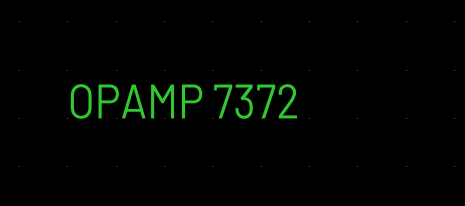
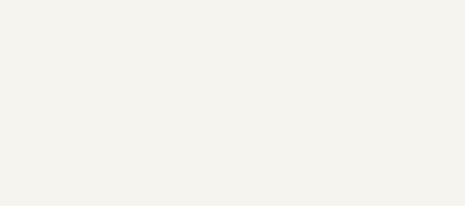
text: OPAMP 7372 (183, 101) -> none

